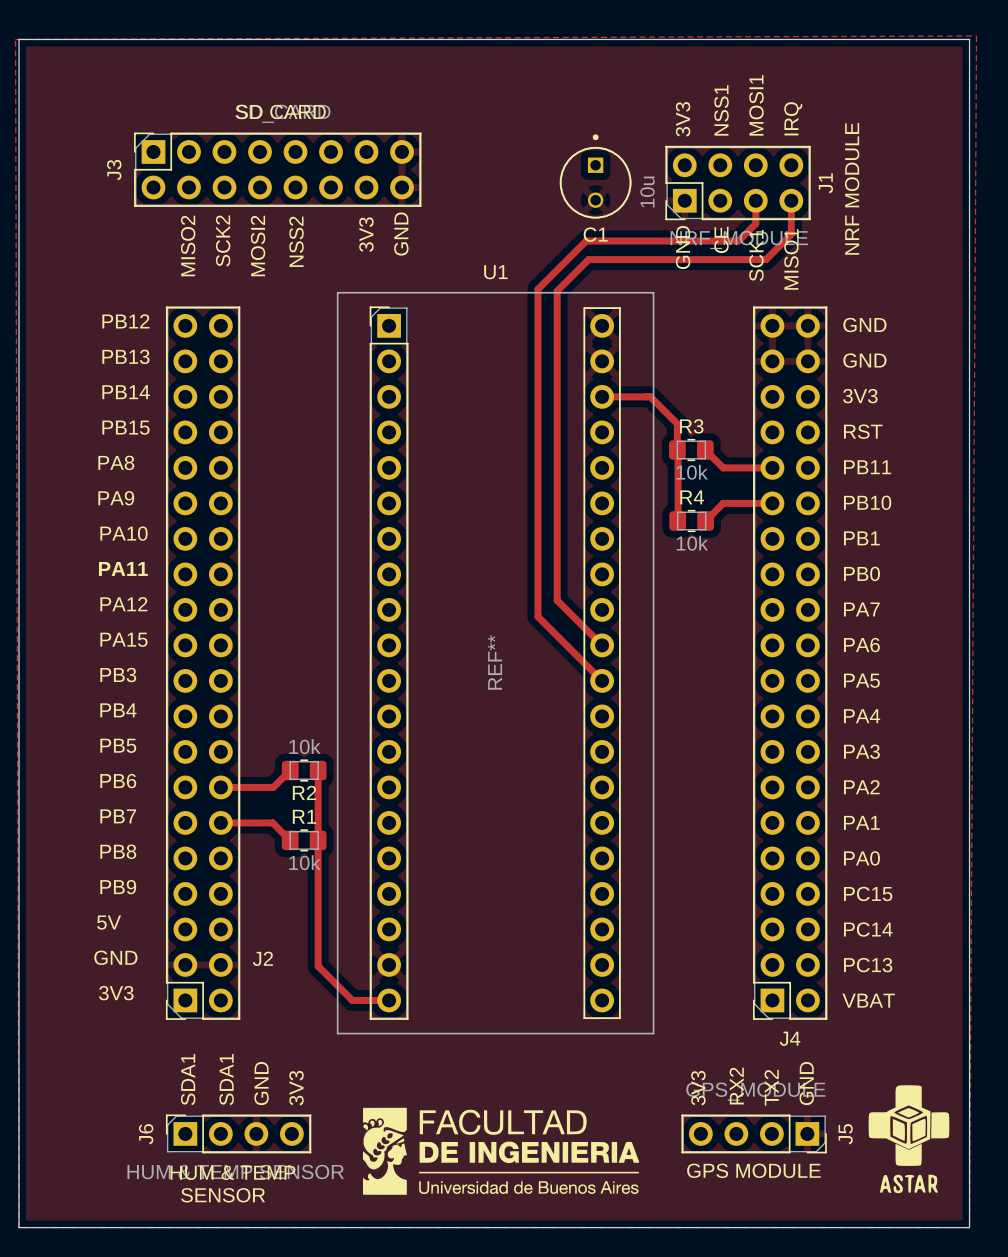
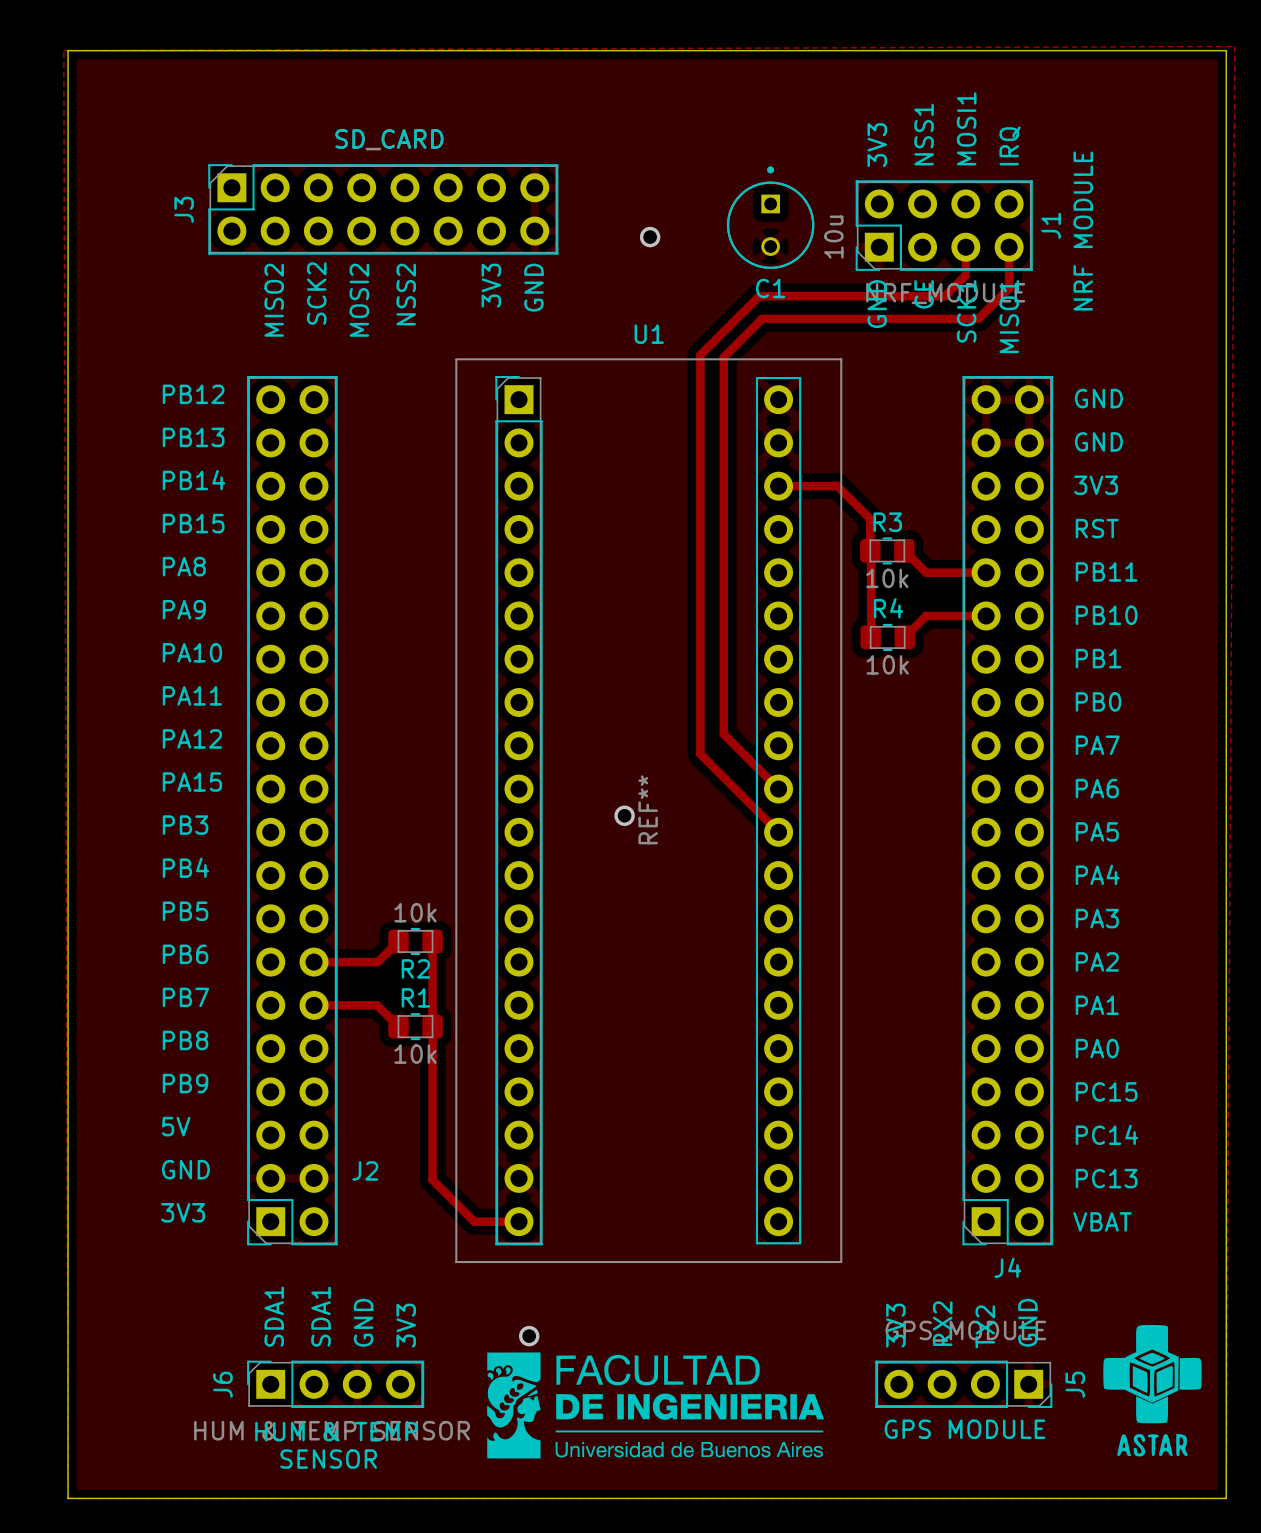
via: none -> (650, 237)
via: none -> (624, 815)
via: none -> (529, 1336)

